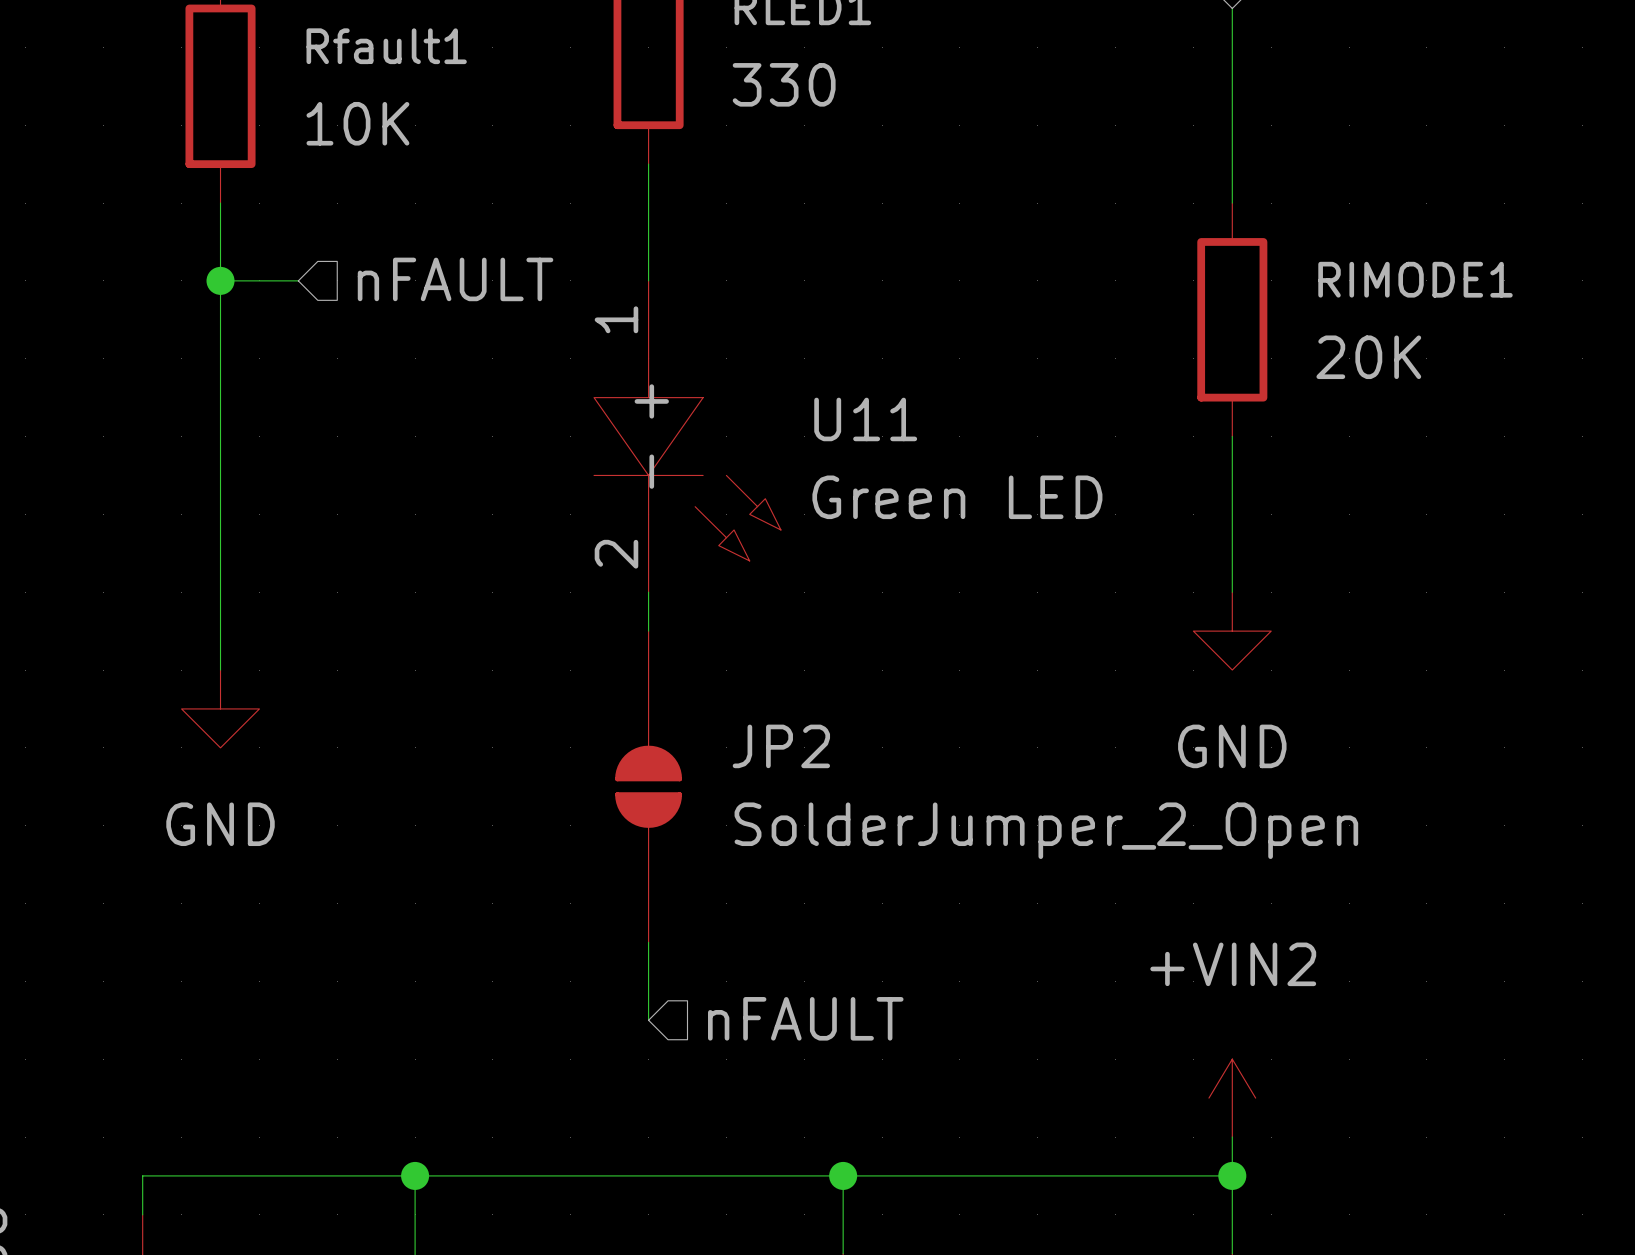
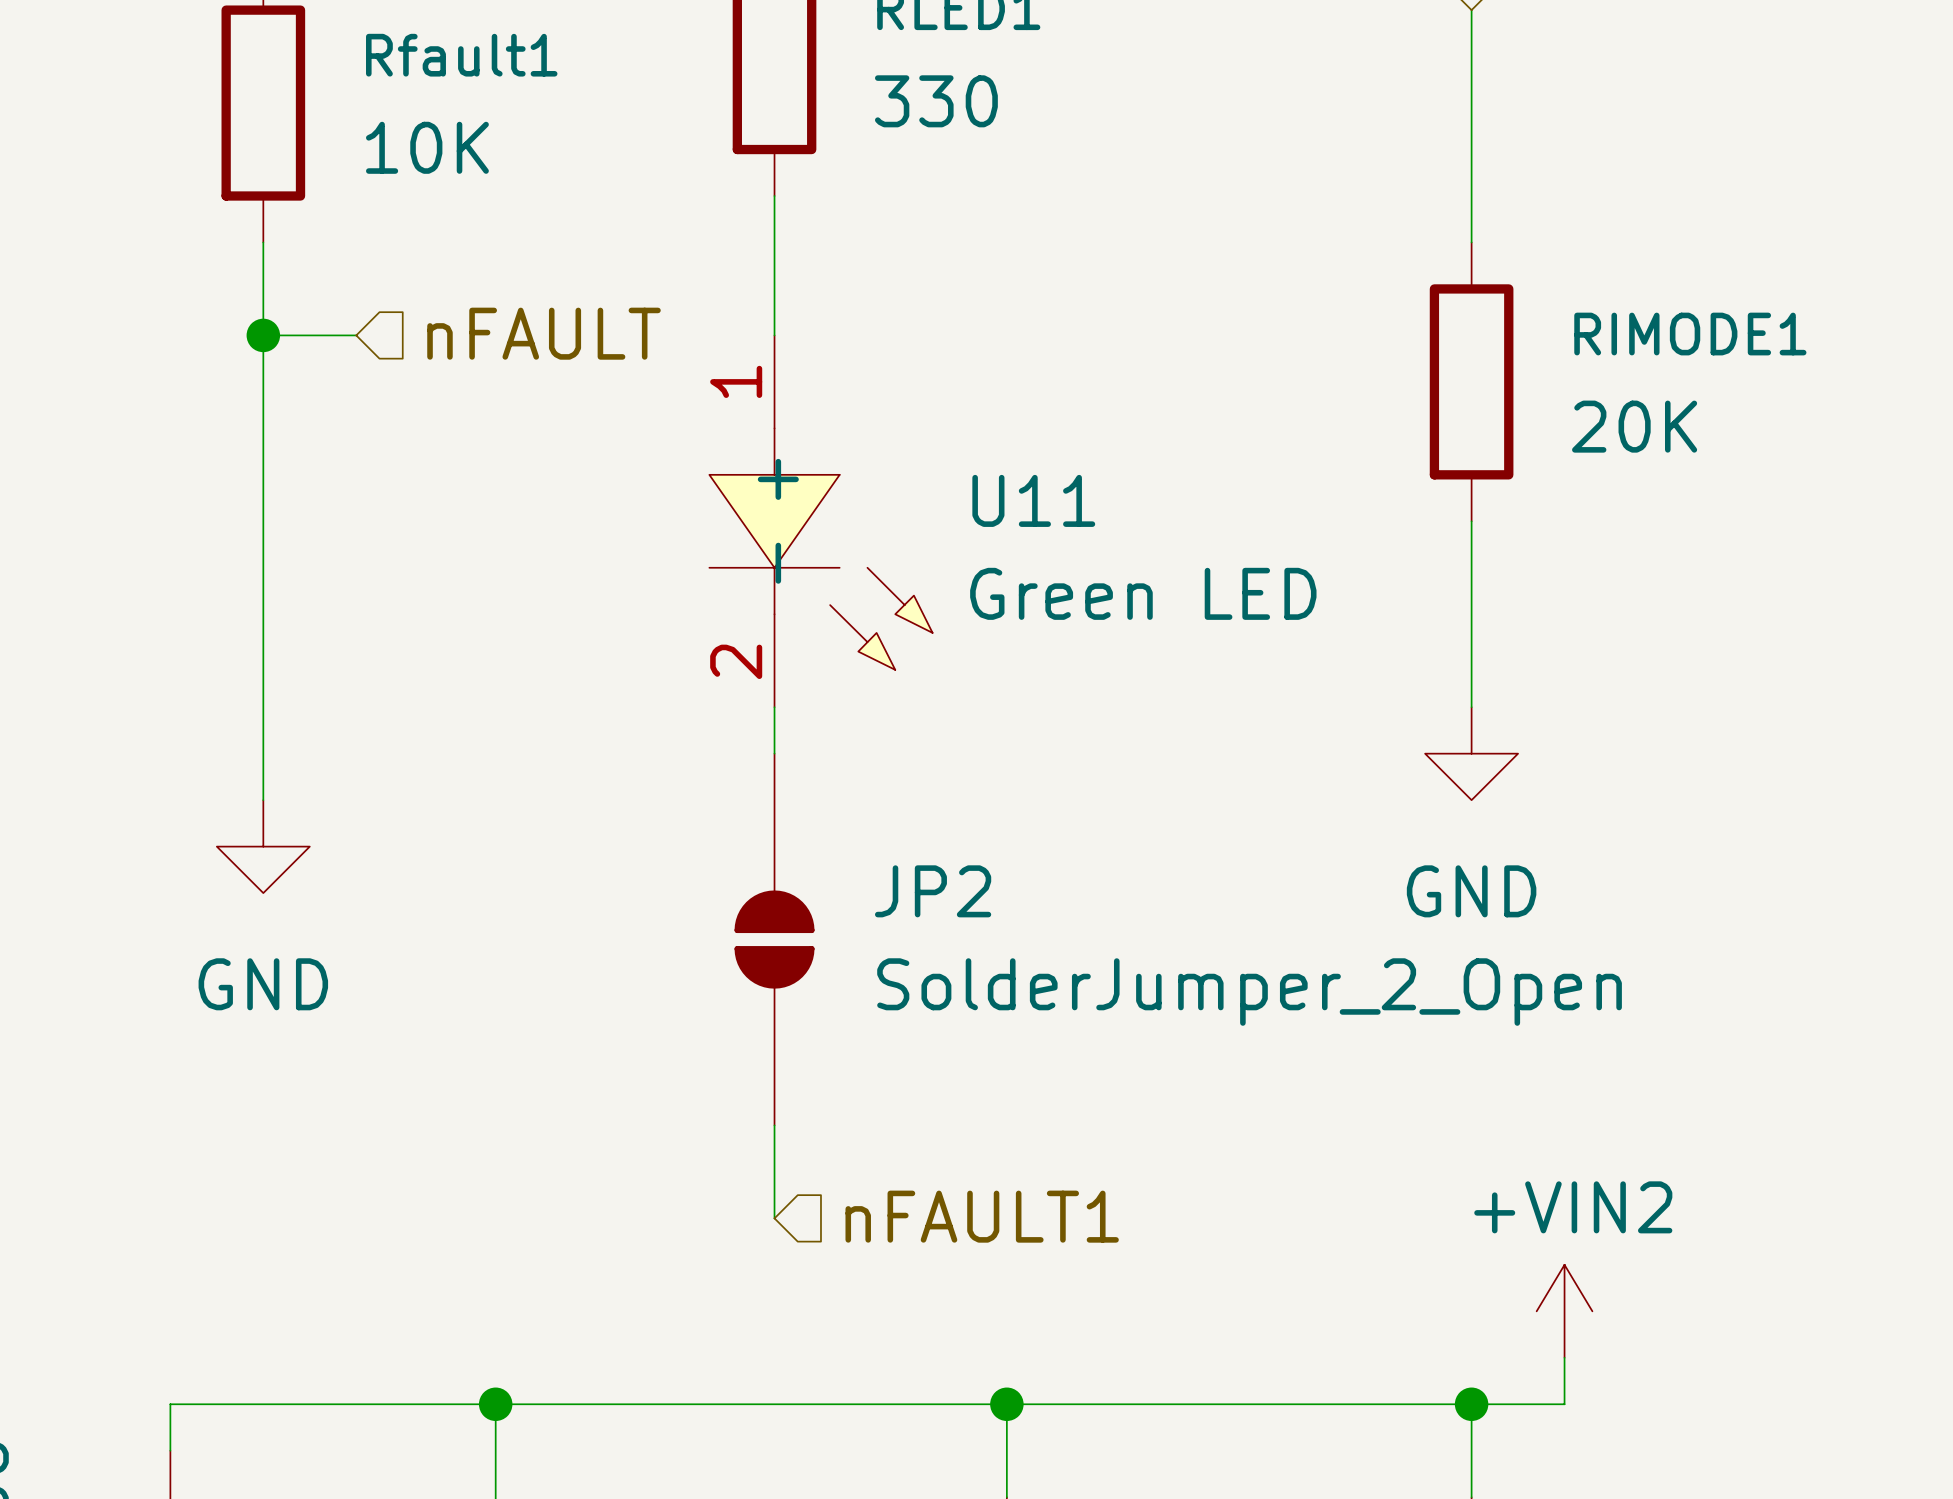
power symbol text position: +VIN2 (1233, 964) -> +VIN2 (1573, 1207)
hierarchical label: nFAULT (805, 1018) -> nFAULT1 (982, 1216)
power symbol position: +VIN2 (1232, 1098) -> +VIN2 (1564, 1311)
wire: (1232, 1137) (1232, 1175) -> (1564, 1357) (1564, 1404) (1471, 1404)

